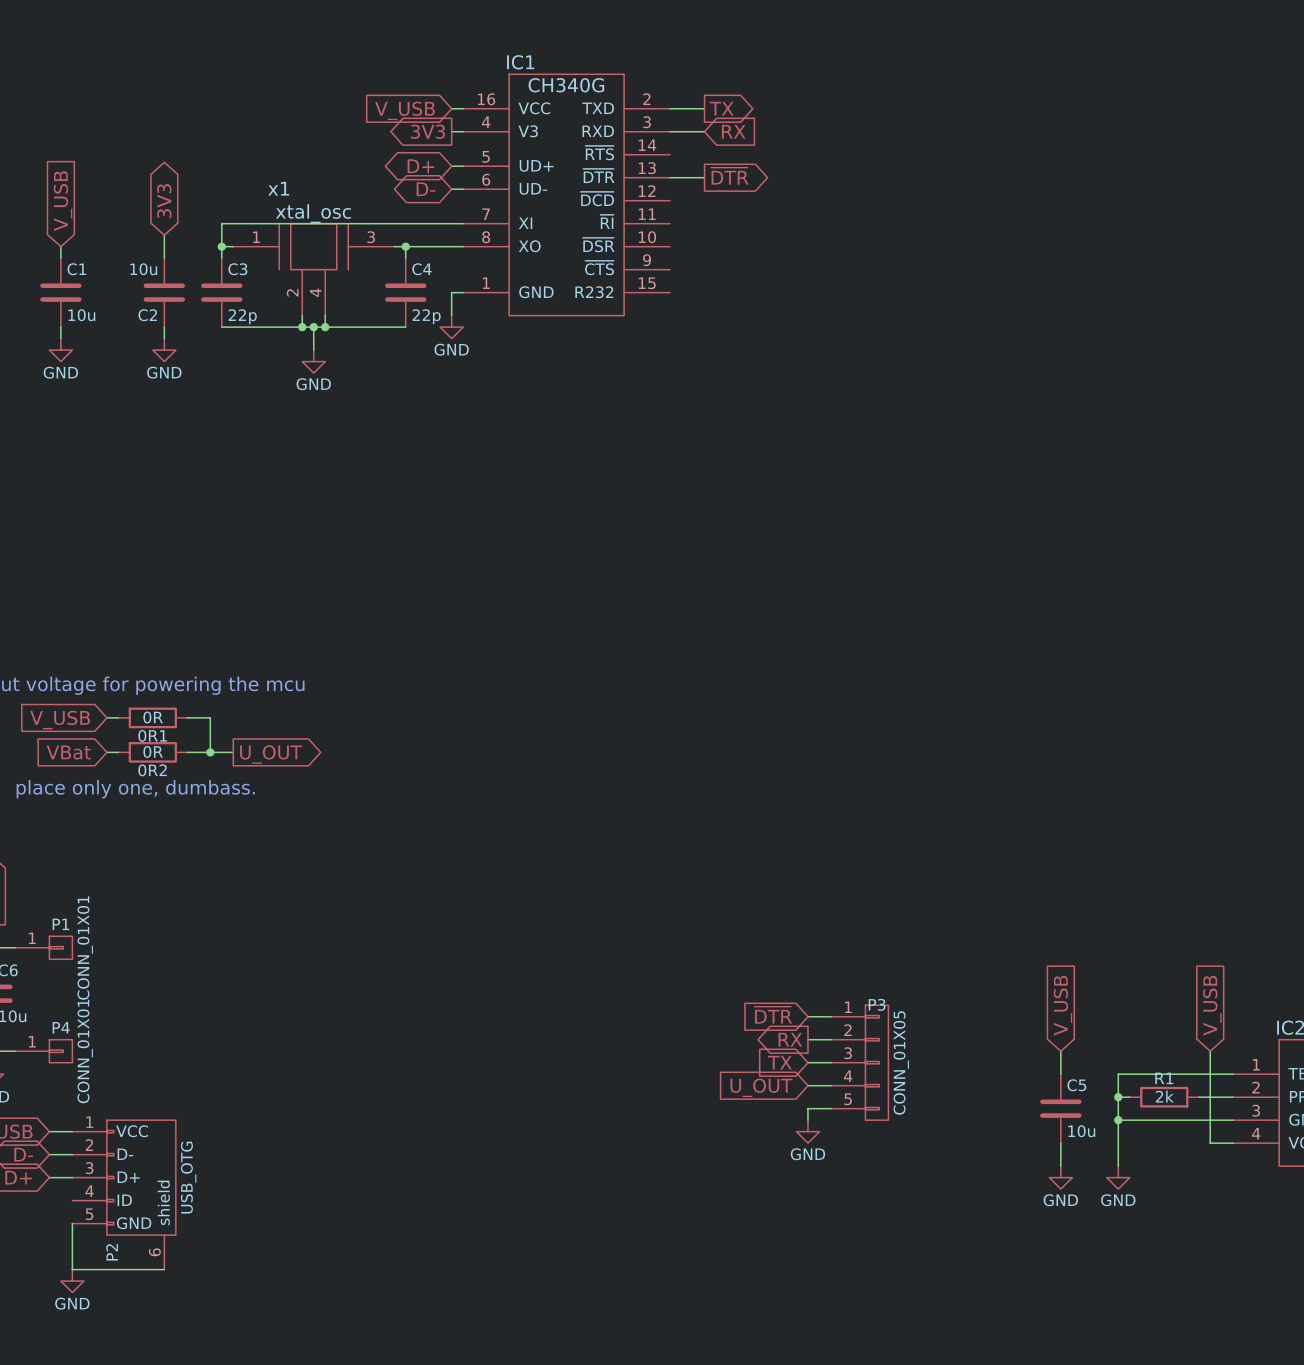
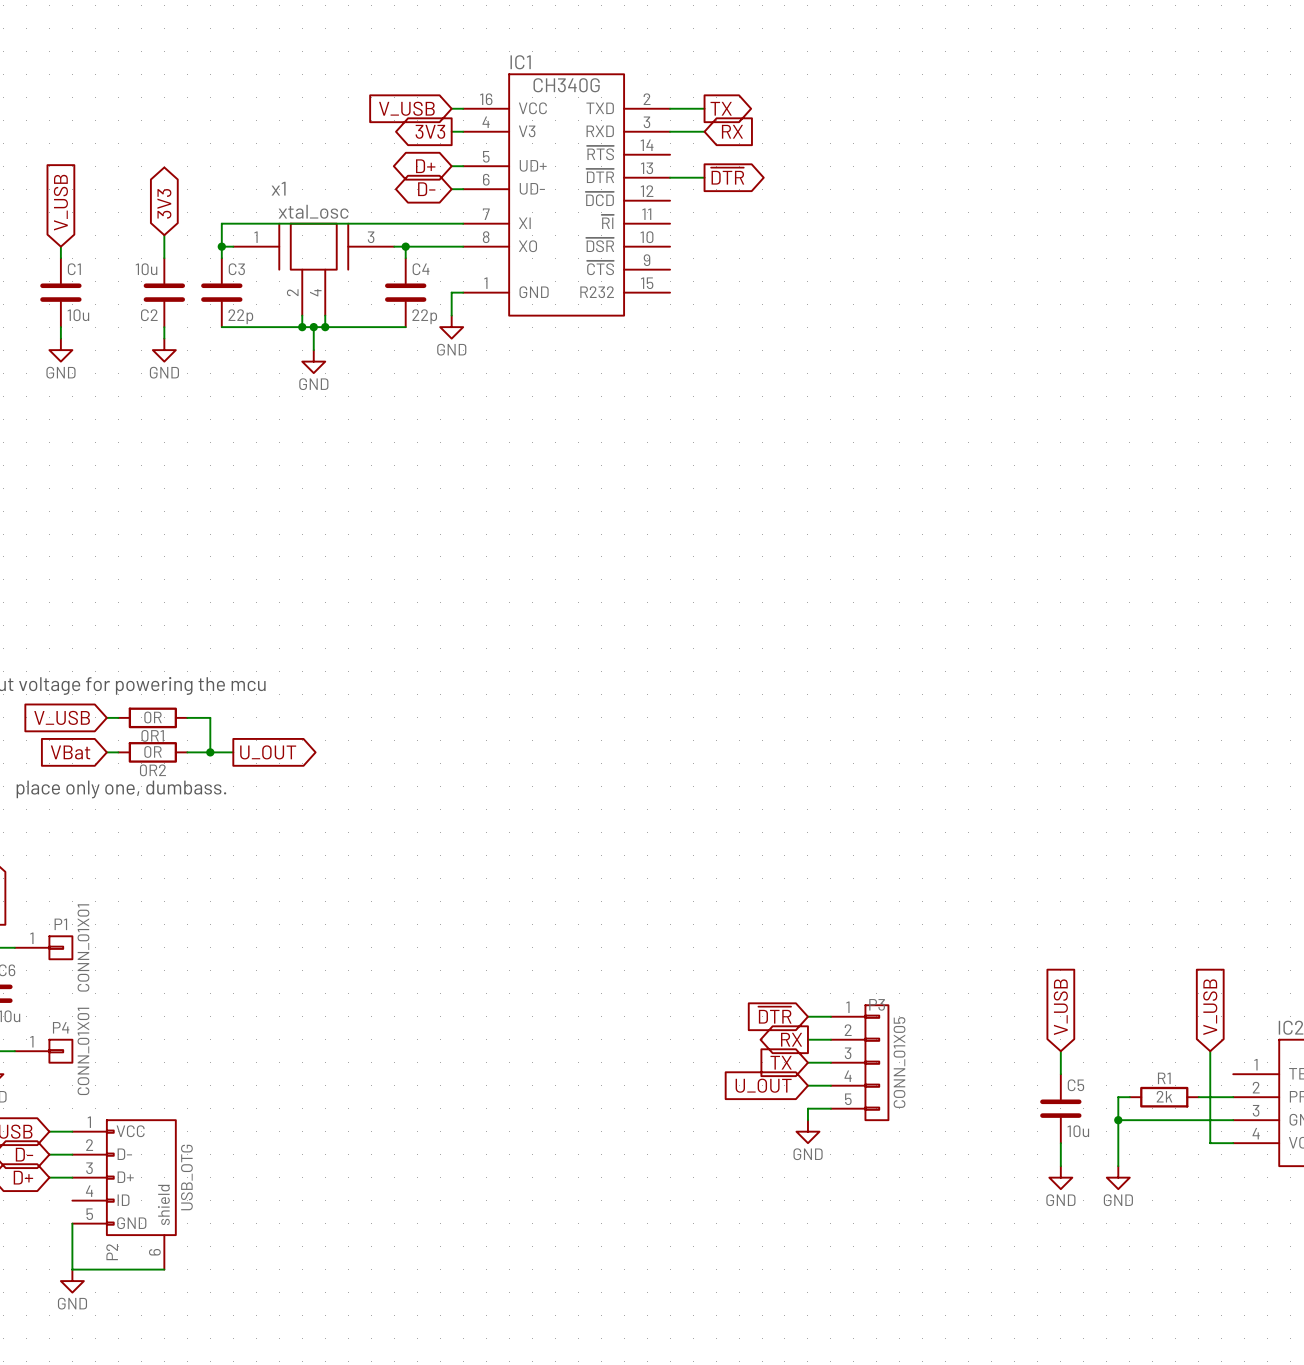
wire: (1233, 1074) (1118, 1074) (1118, 1097) -> none
junction: (1118, 1097) -> none

